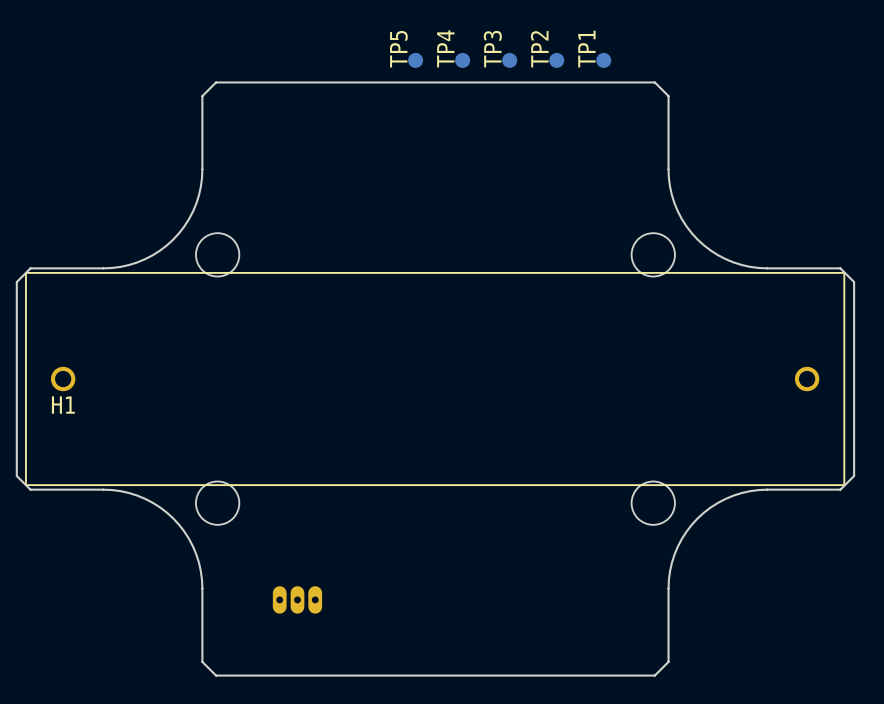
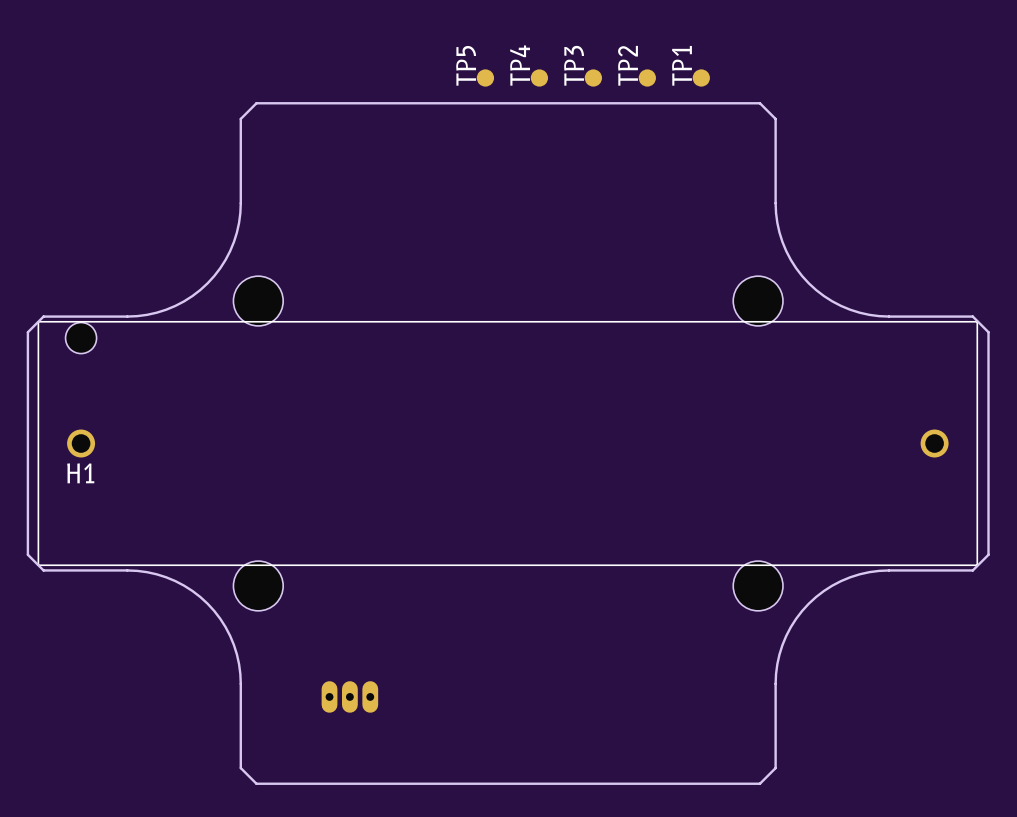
H1 footprint: [25, 272, 845, 486] -> [37, 320, 979, 567]

